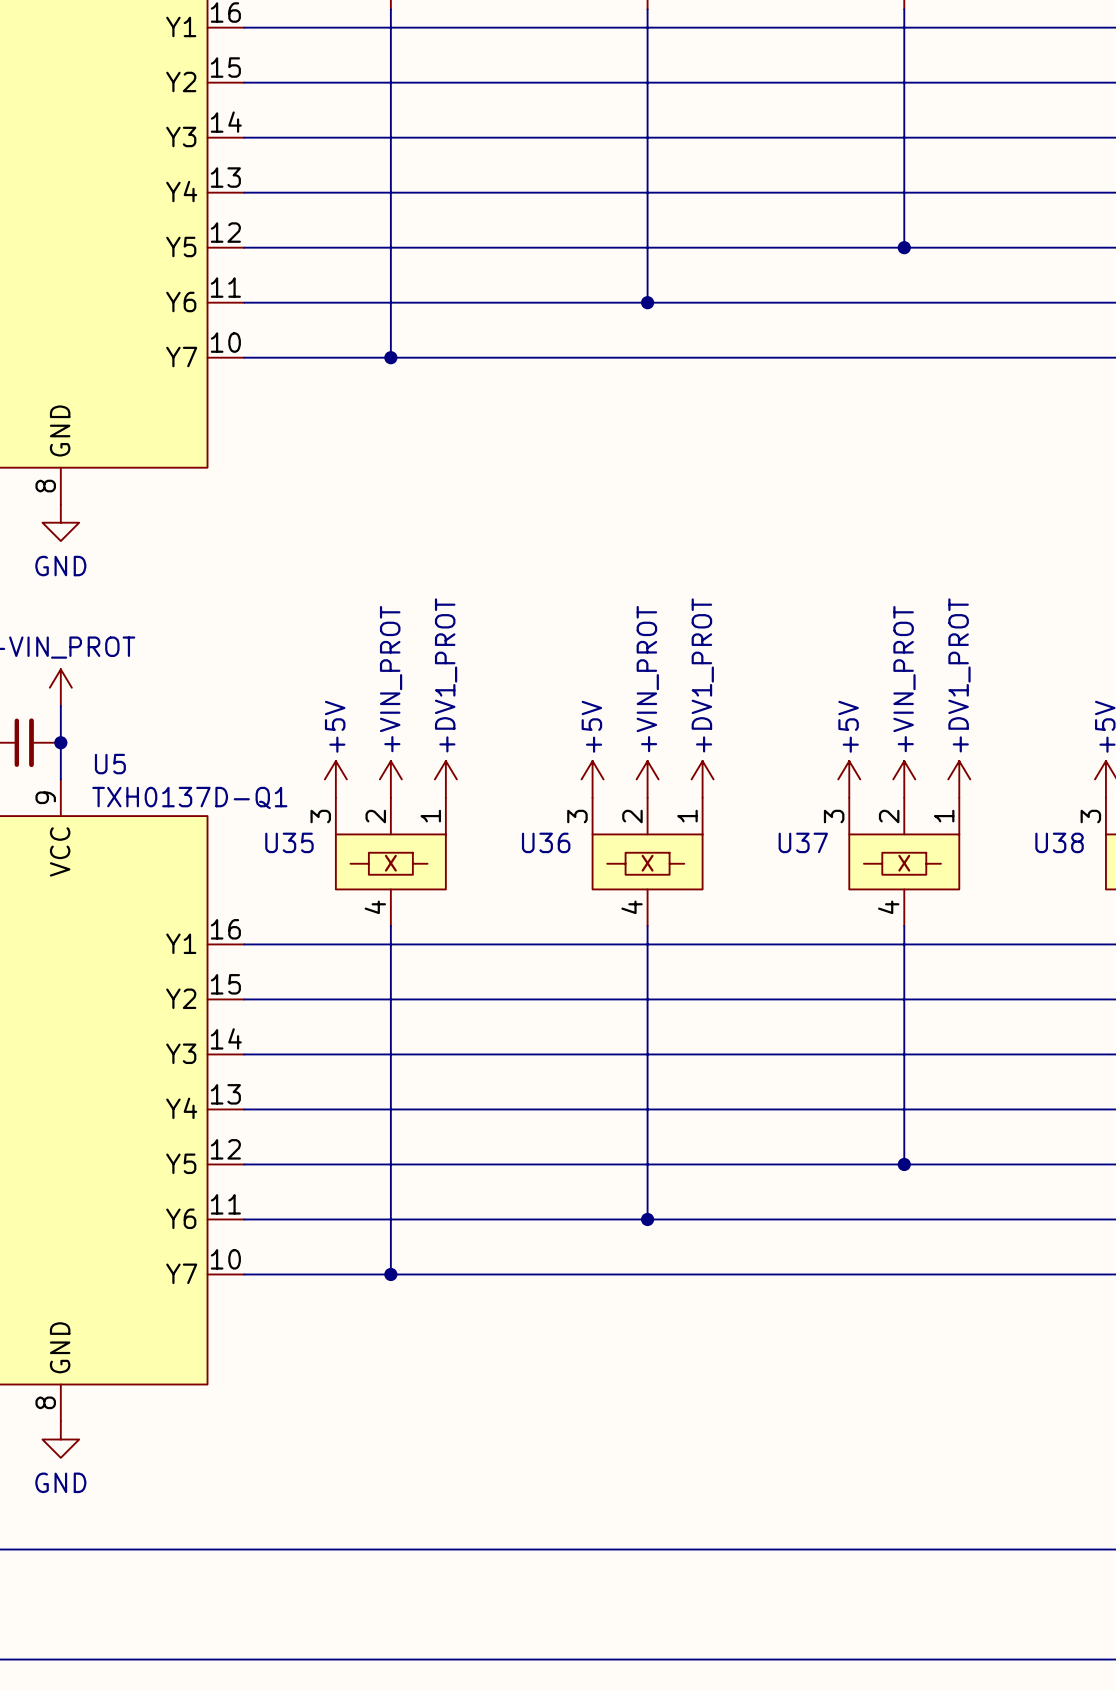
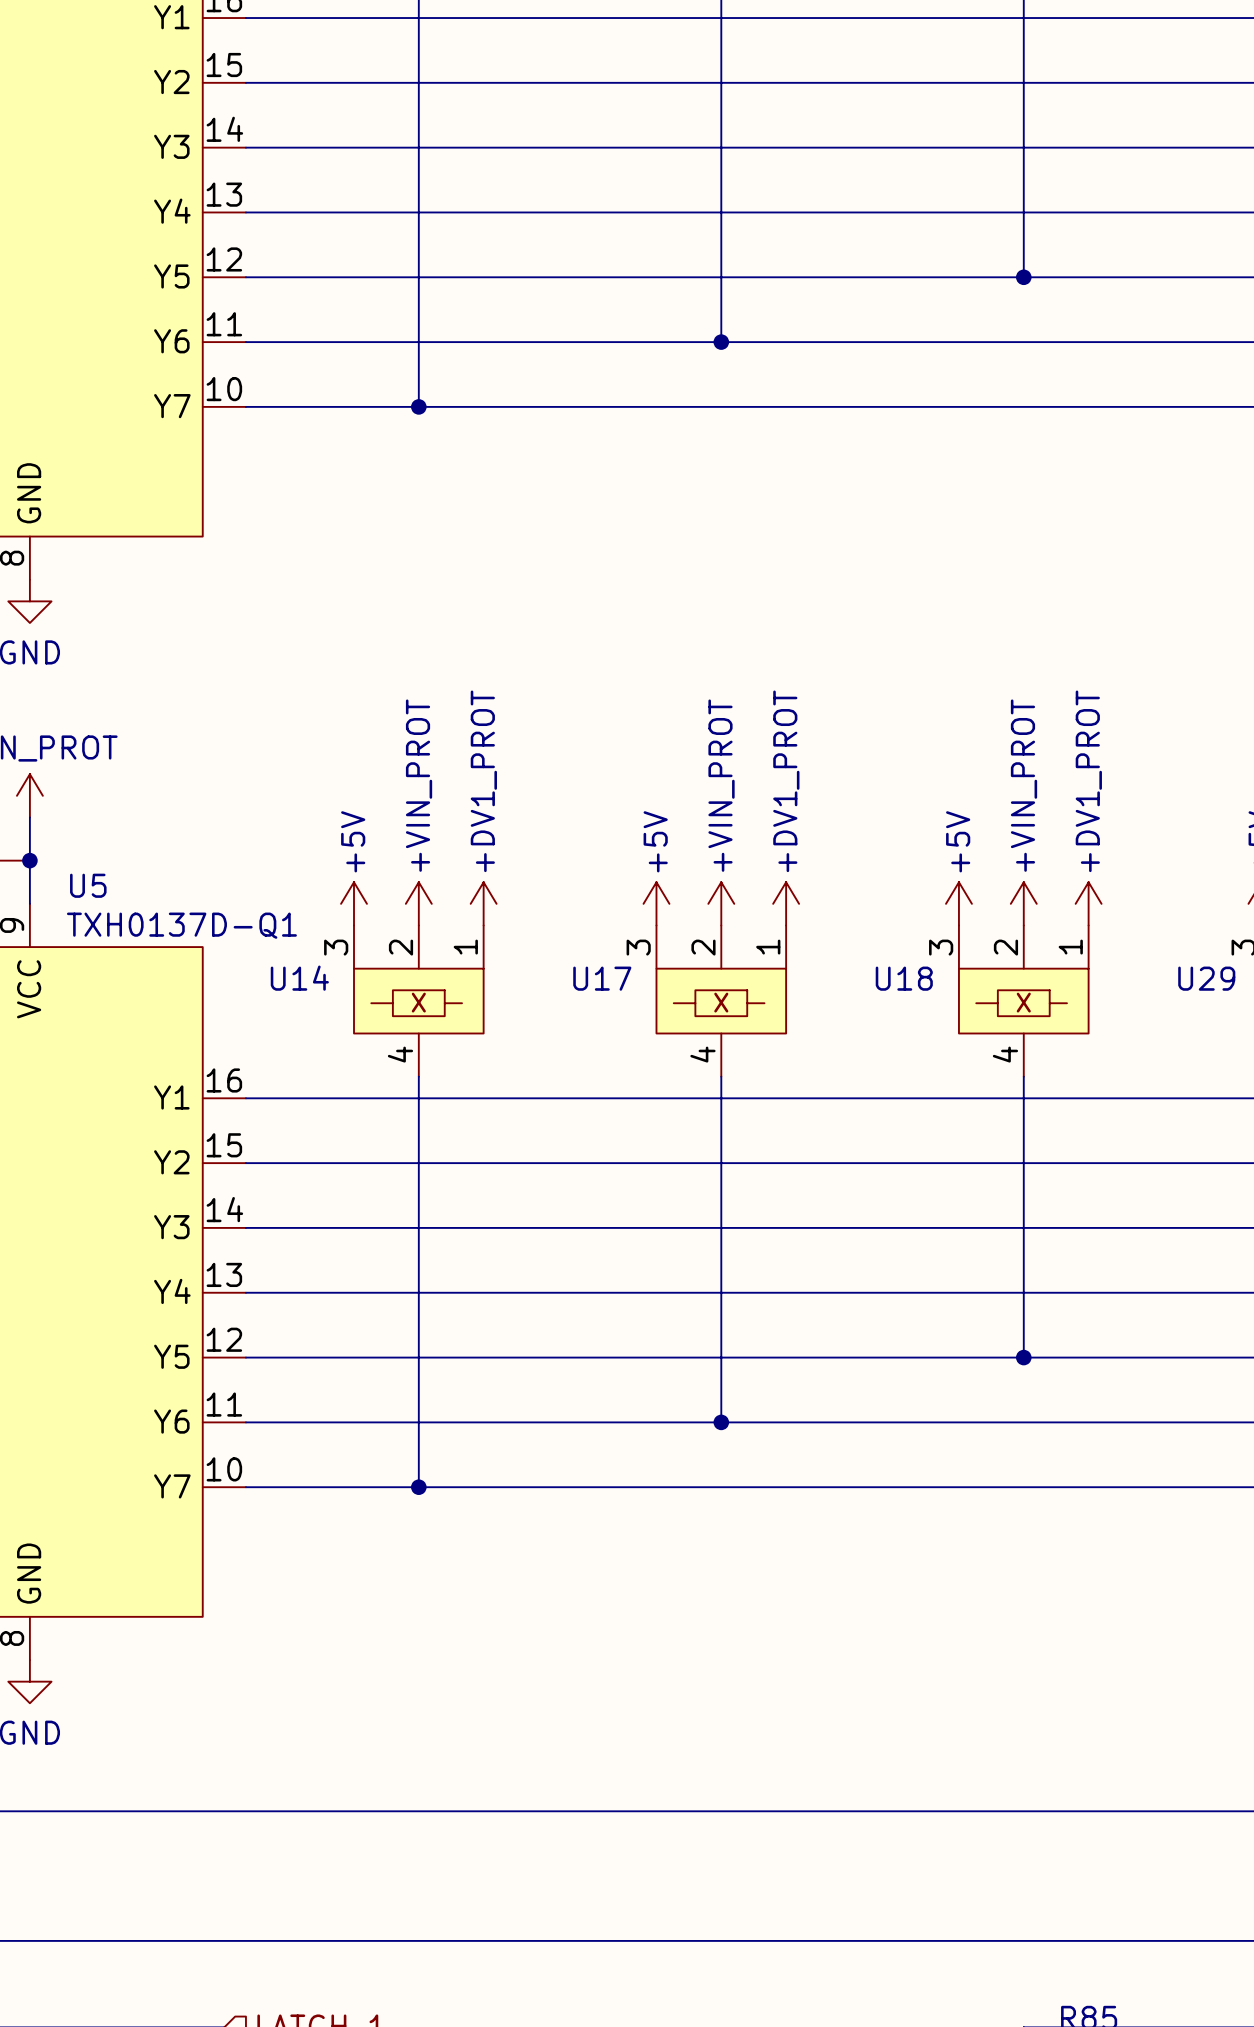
U35 name: U35 (289, 842) -> U14 (299, 978)
U36 name: U36 (546, 842) -> U17 (602, 978)
U37 name: U37 (803, 842) -> U18 (904, 978)
U38 name: U38 (1059, 842) -> U29 (1206, 978)

